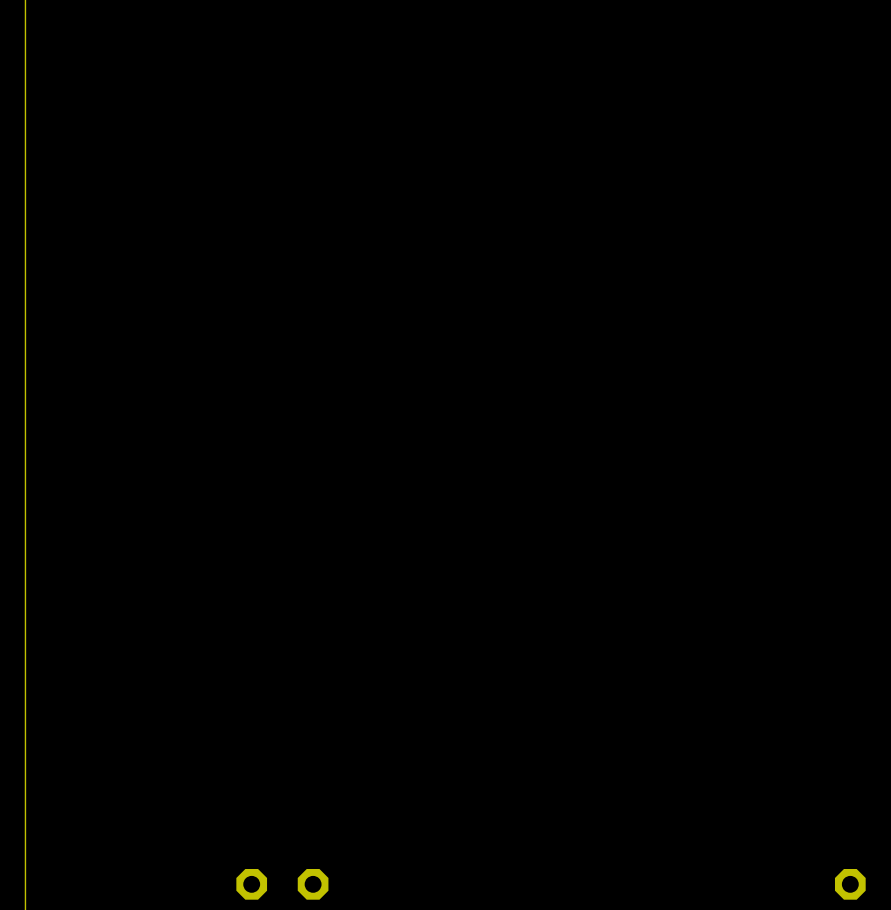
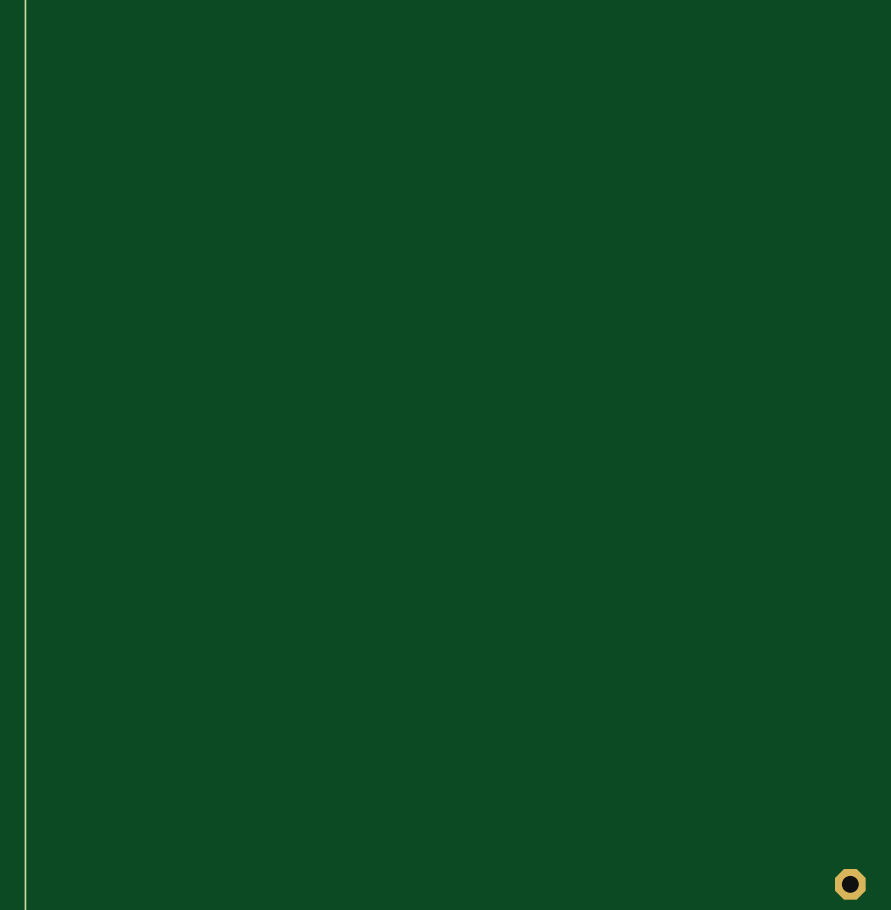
part: (251, 884) -> none
part: (313, 884) -> none

